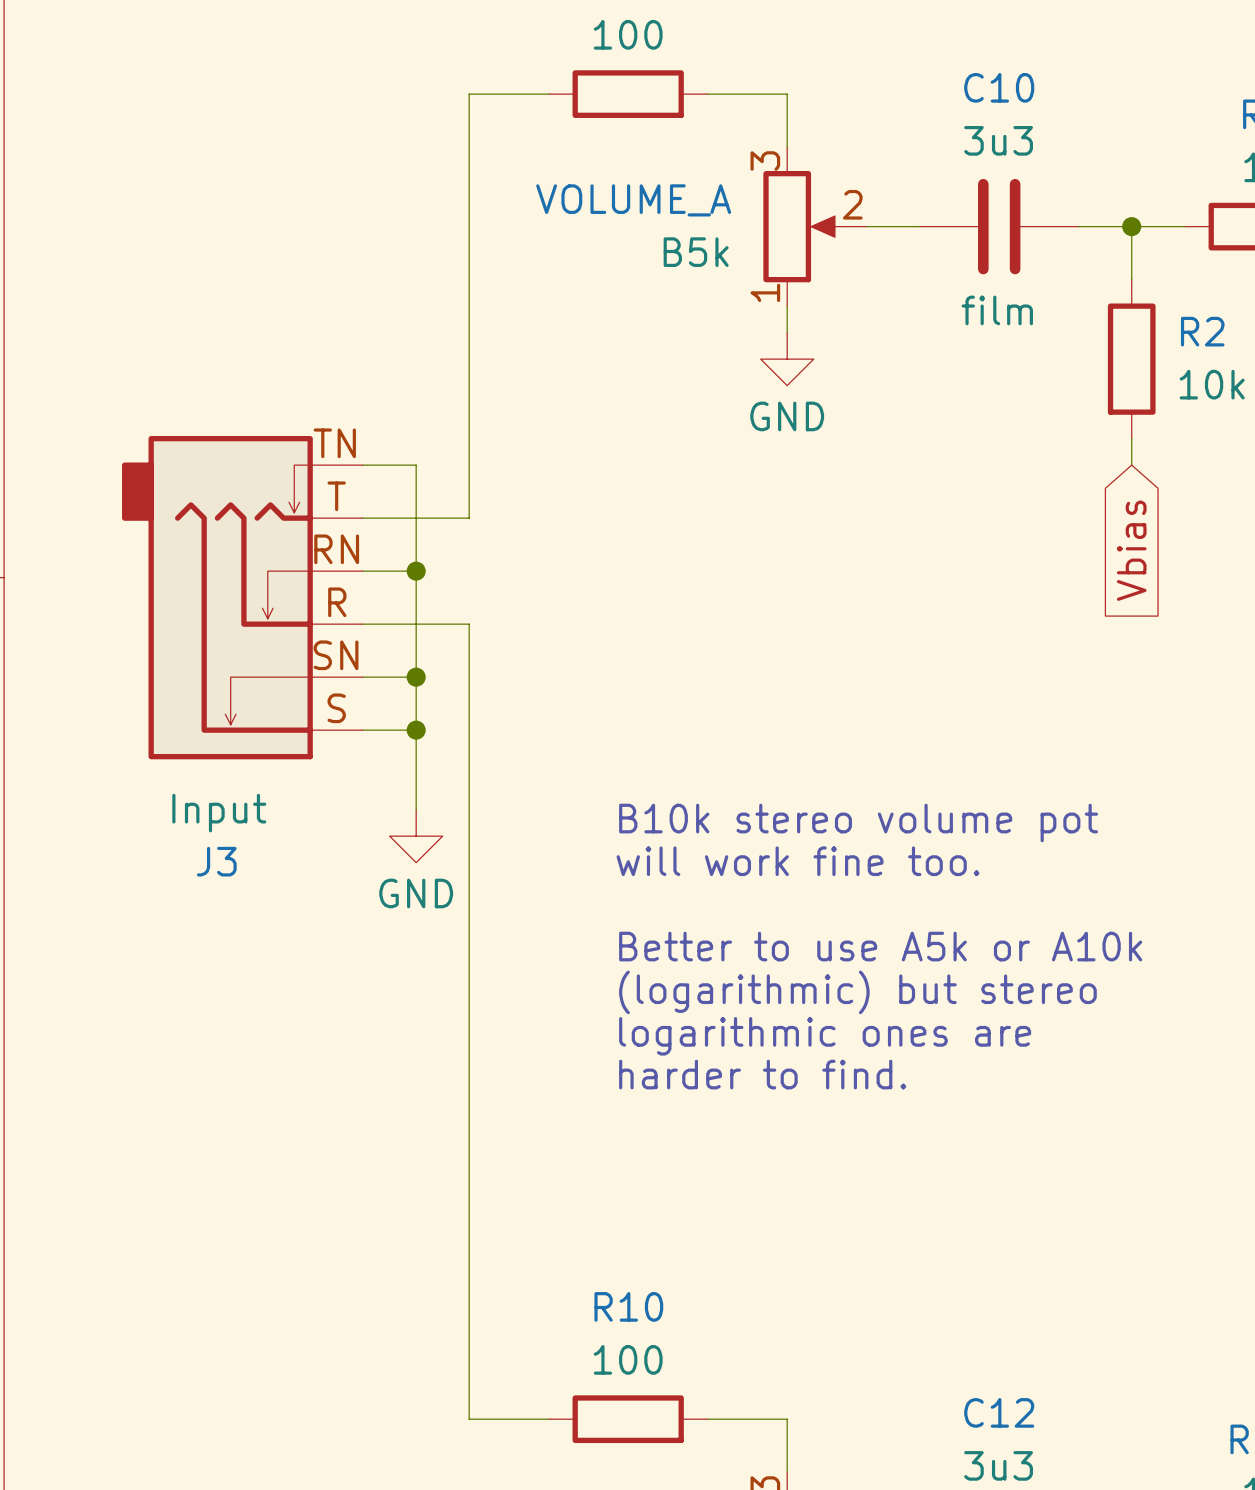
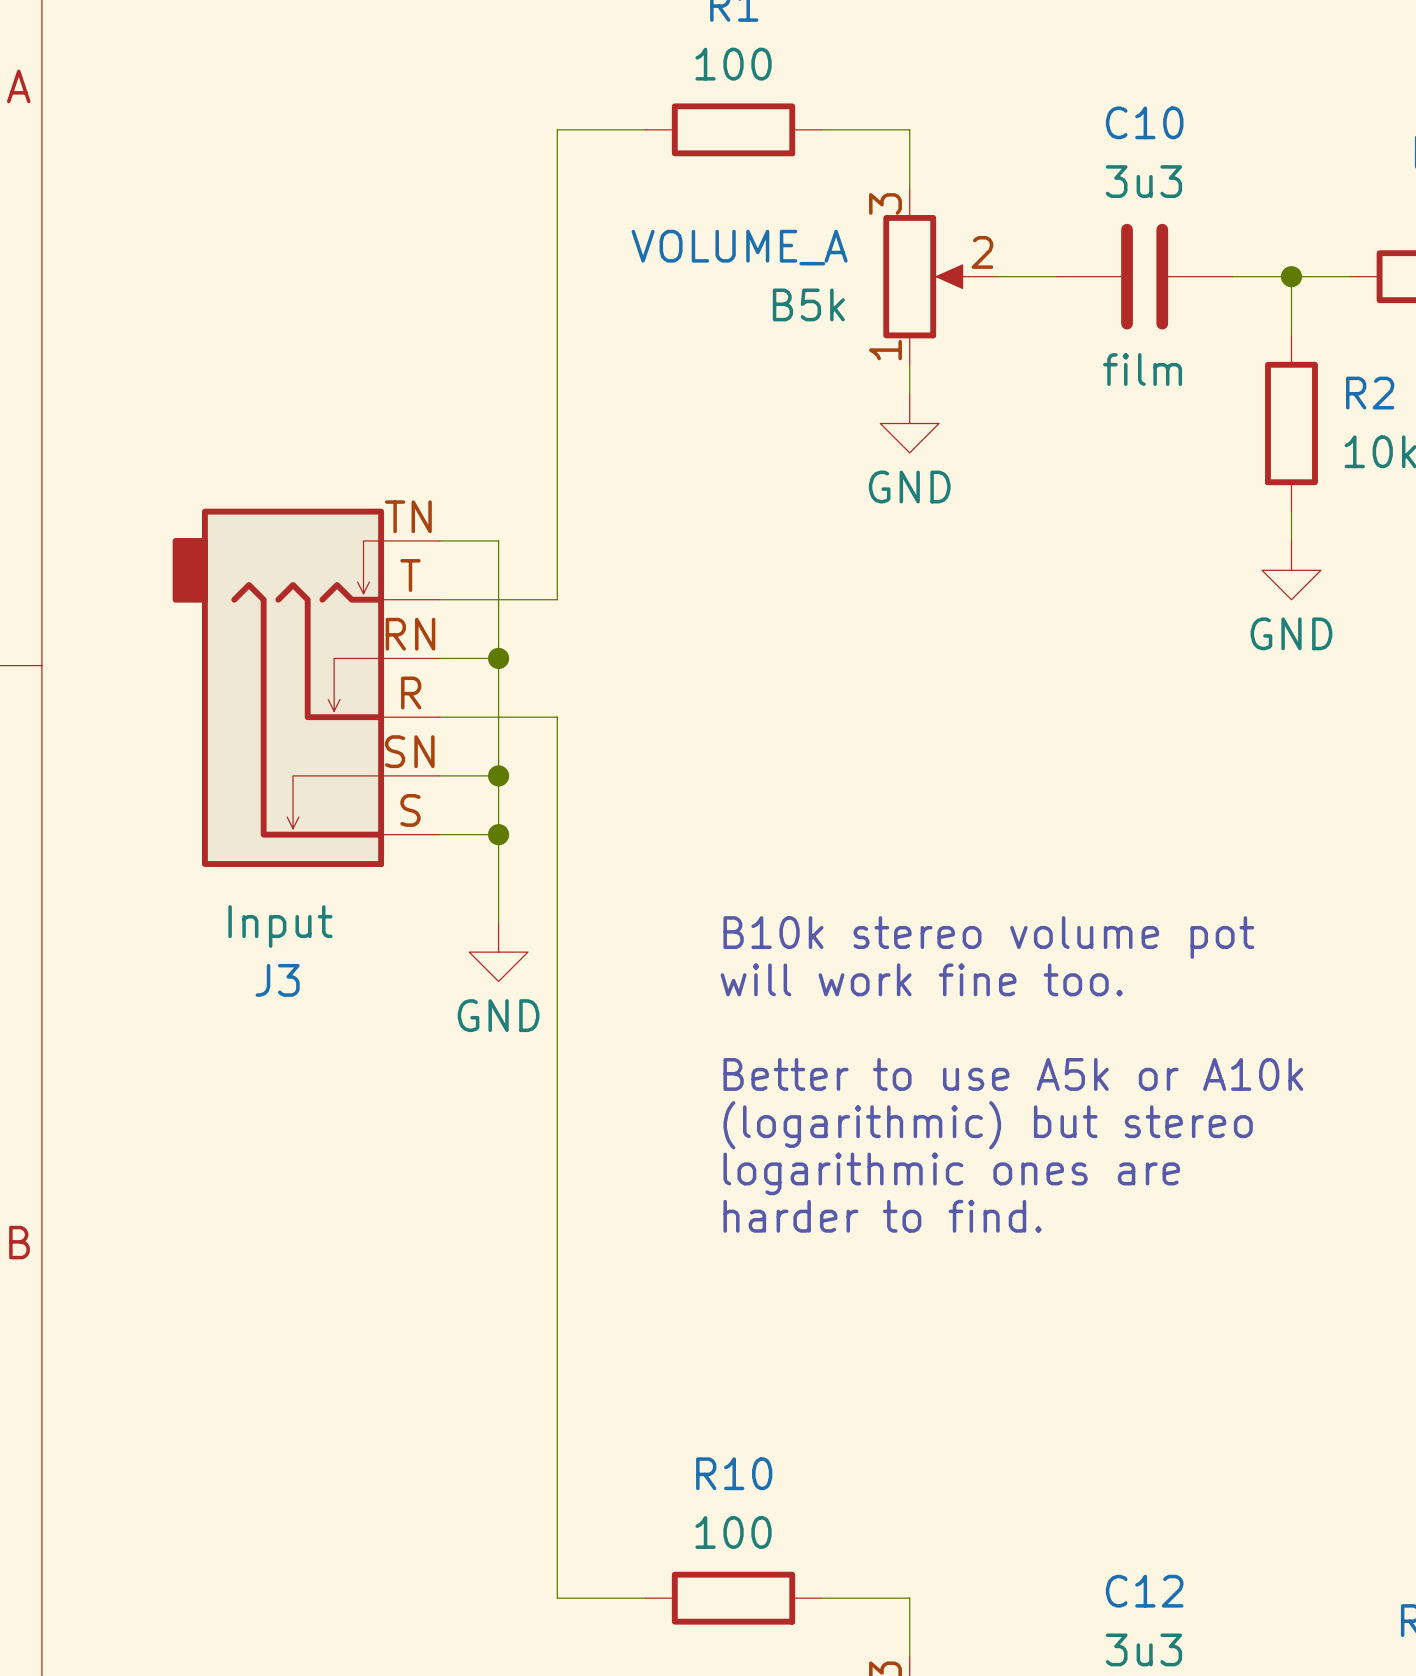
power symbol: none -> GND (1291, 570)
global label: Vbias (1131, 550) -> none

